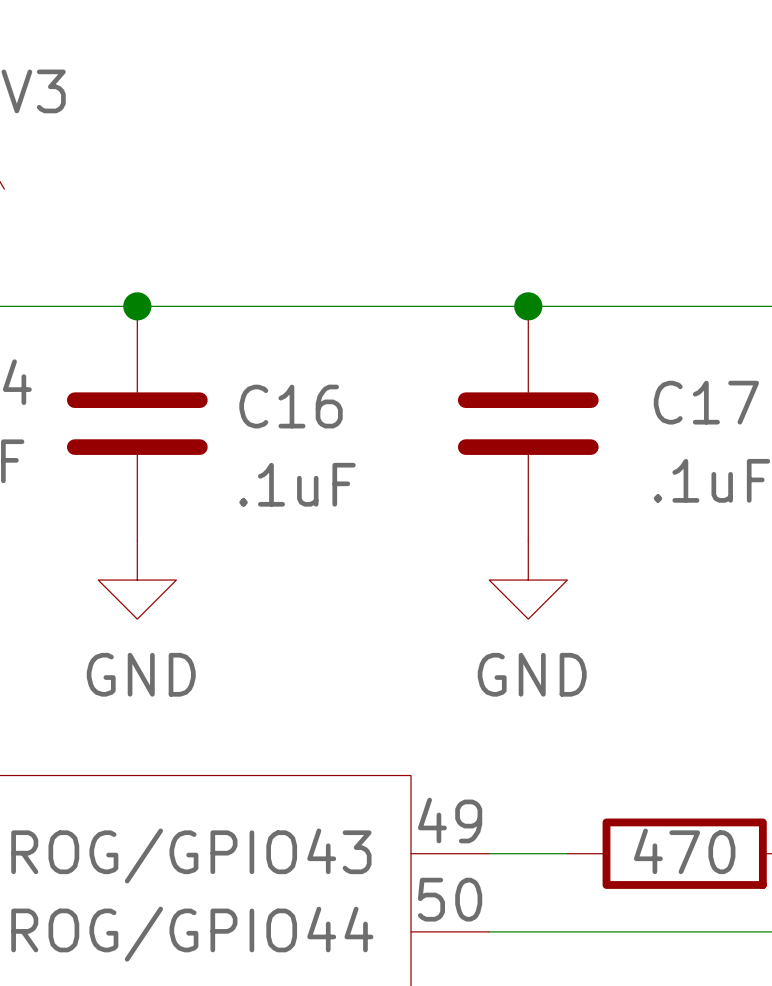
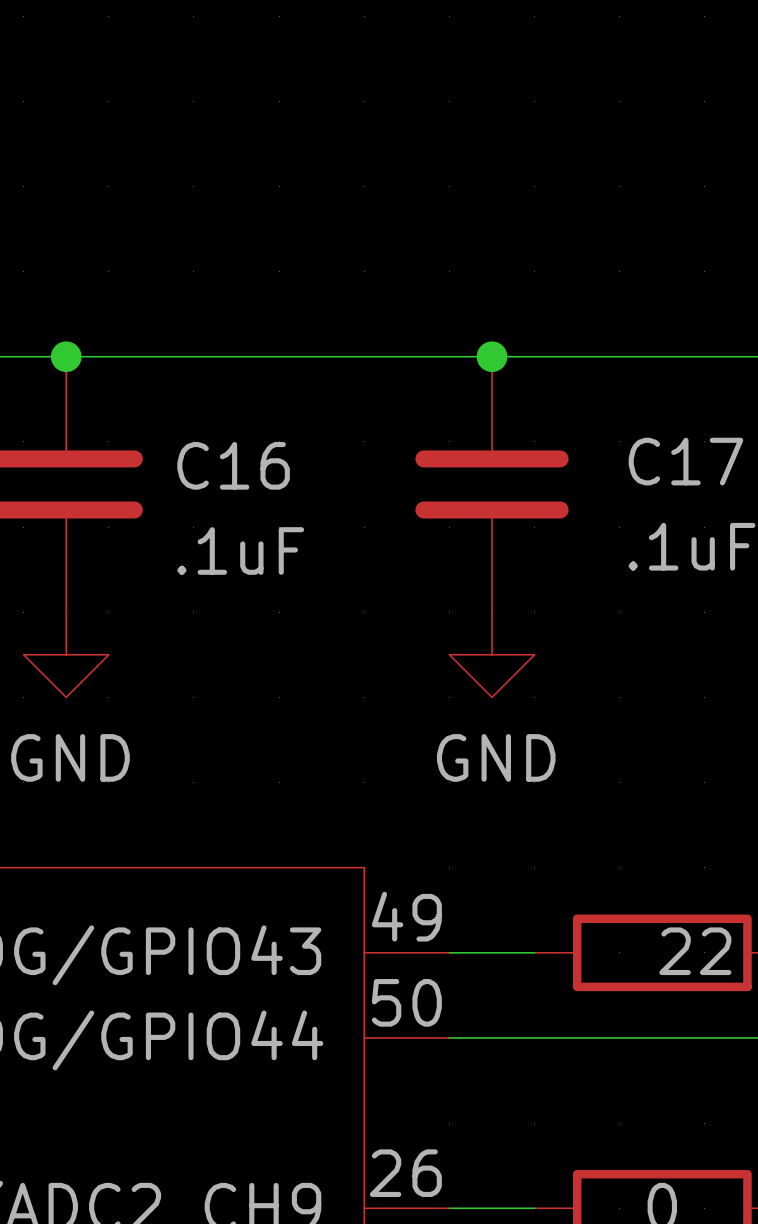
part value: 470 (684, 851) -> 22 (695, 951)

